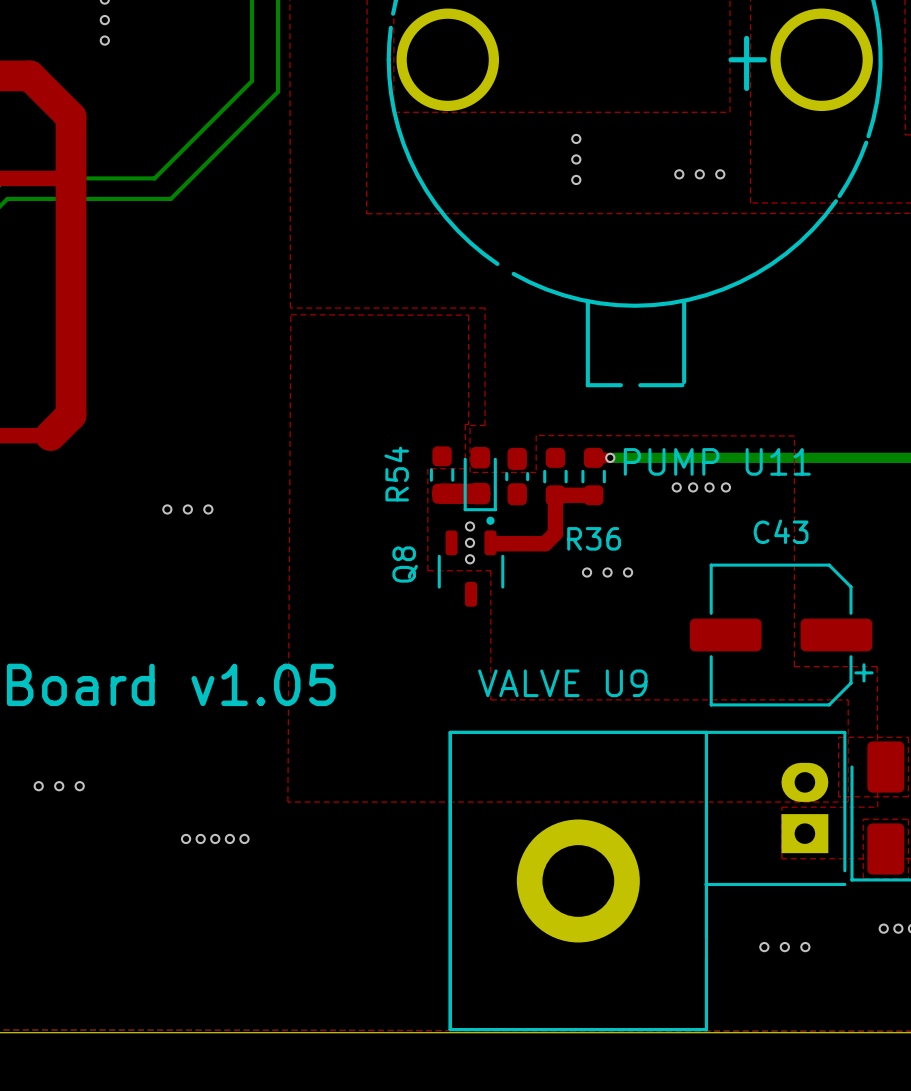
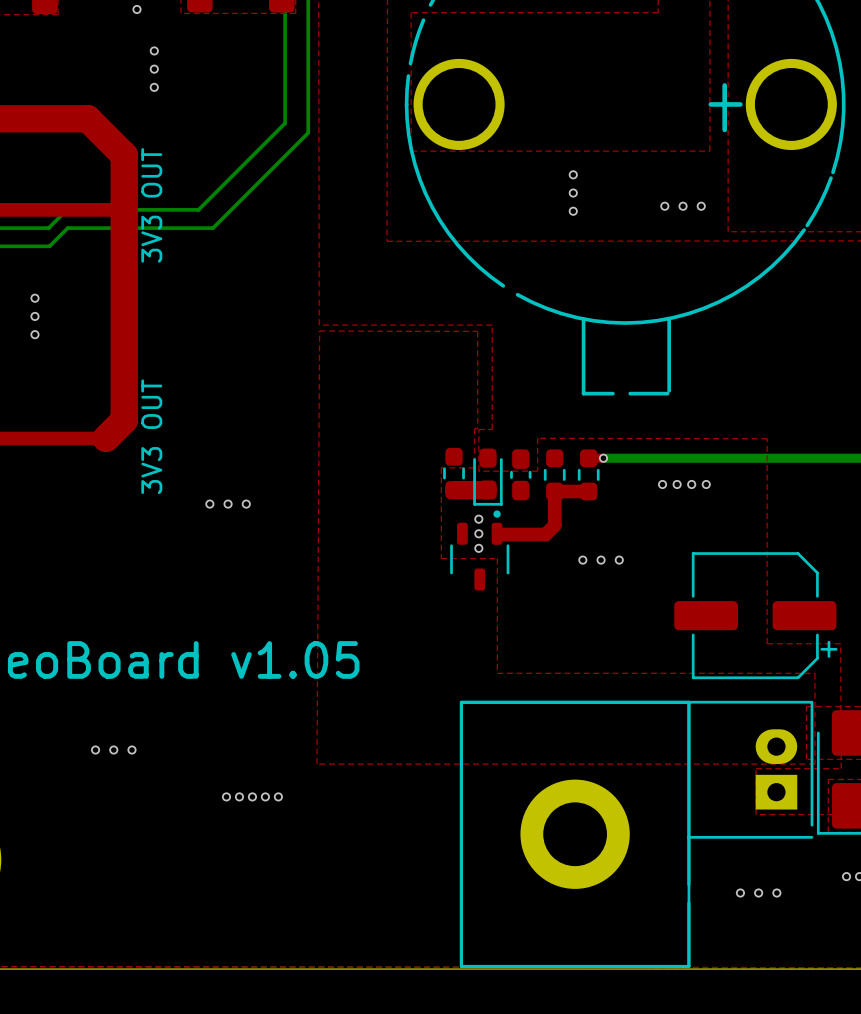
text: none -> 3V3 OUT (151, 205)
text: none -> 3V3 OUT (151, 436)
text: PUMP U11 (717, 461) -> none
text: R54 (396, 474) -> none
text: C43 (781, 531) -> none
text: R36 (594, 538) -> none
text: Q8 (405, 564) -> none
text: VALVE U9 (562, 683) -> none

